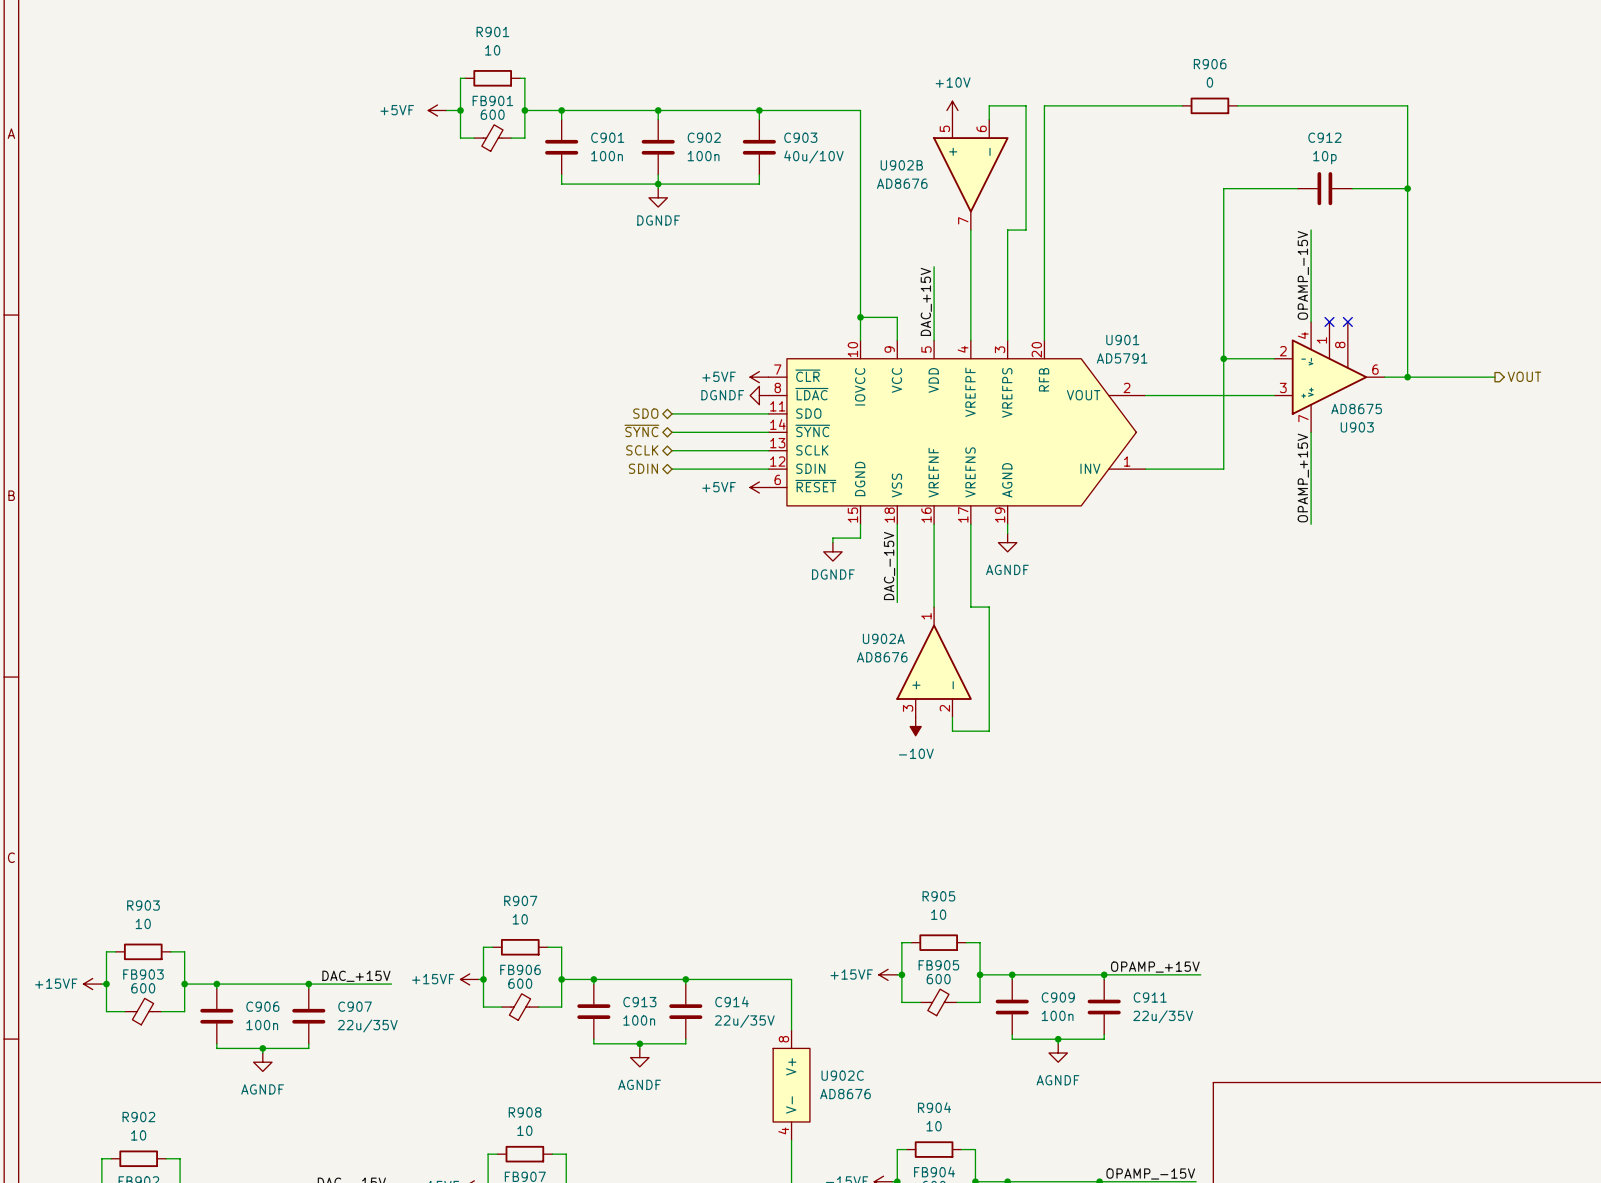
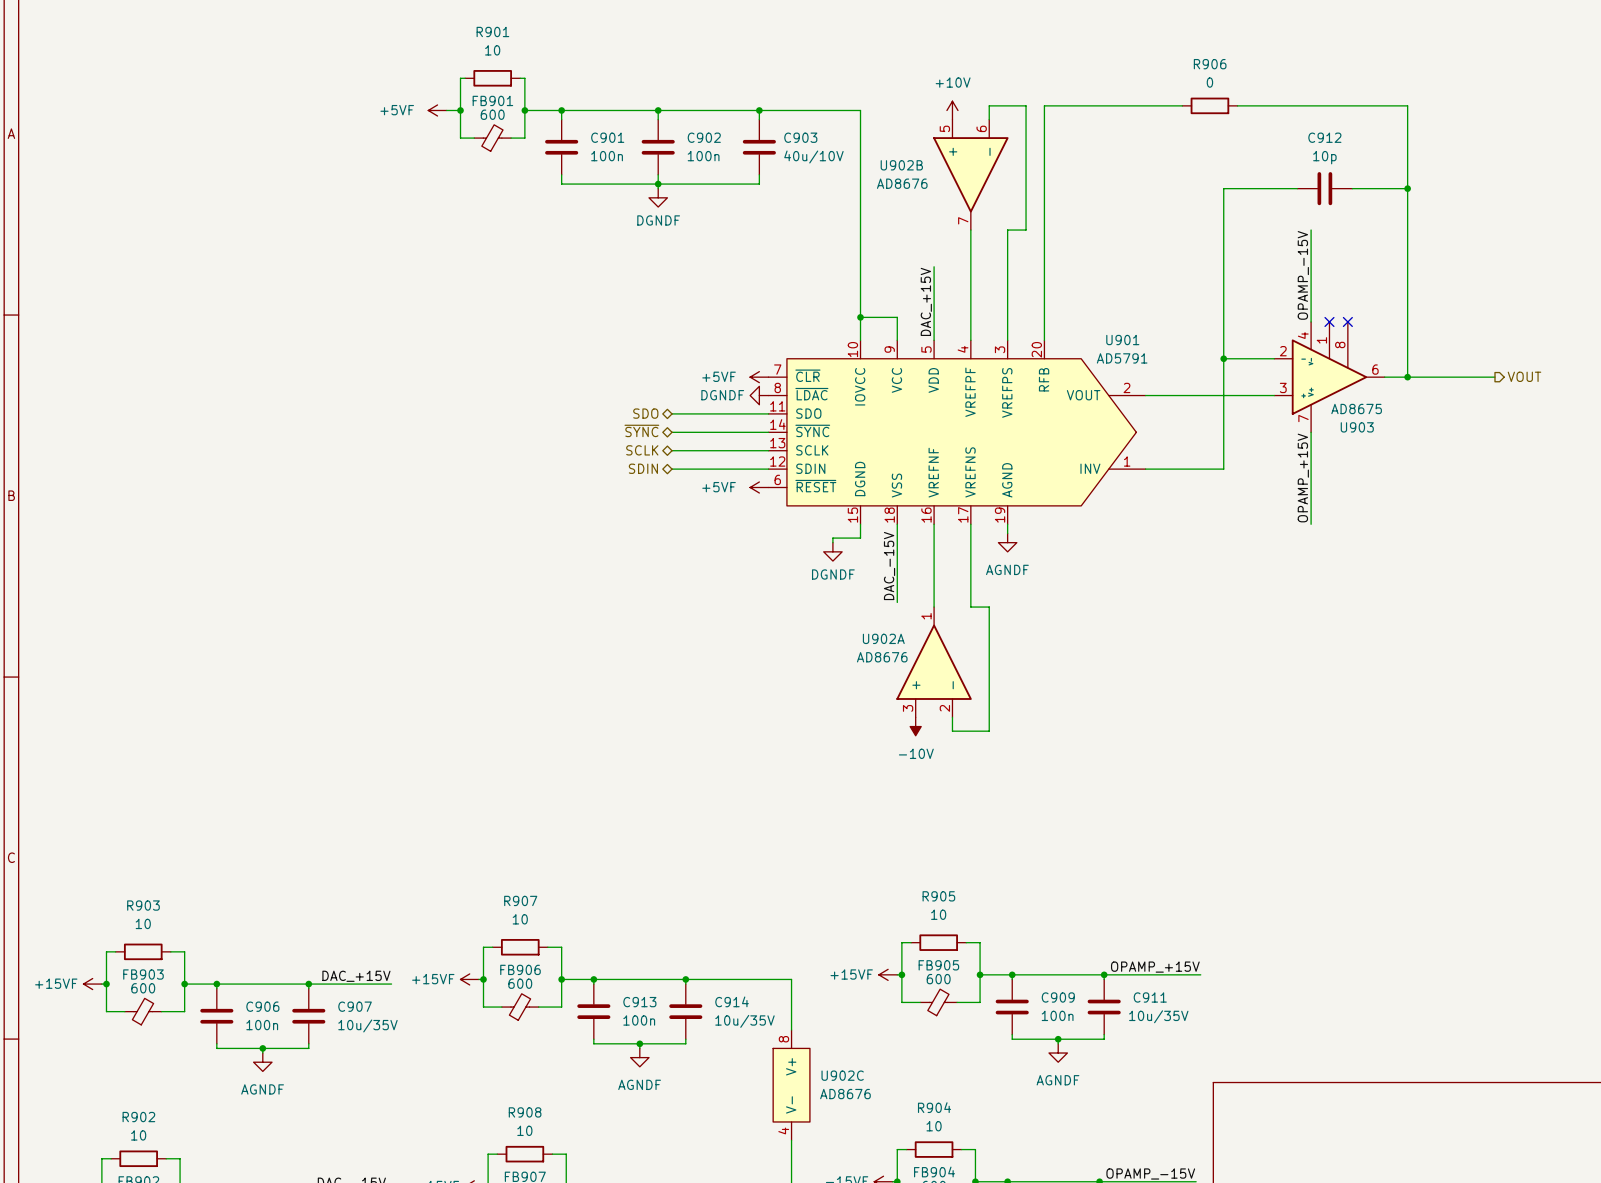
C911 value: 22u/35V (1163, 1016) -> 10u/35V (1158, 1016)
C914 value: 22u/35V (744, 1021) -> 10u/35V (744, 1021)
C907 value: 22u/35V (367, 1025) -> 10u/35V (367, 1025)

